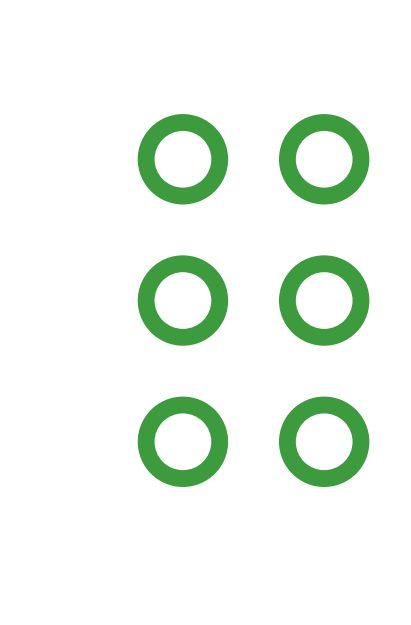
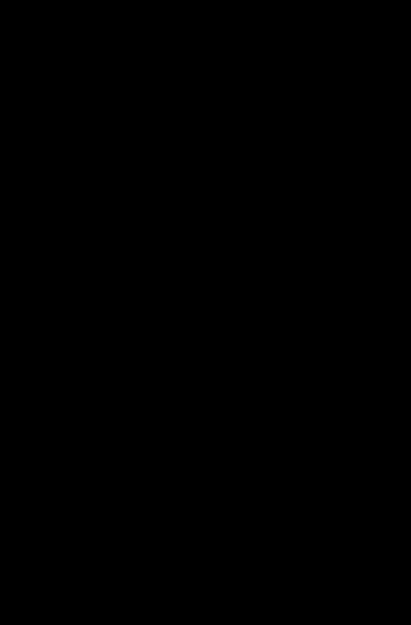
part: (253, 300) -> none

